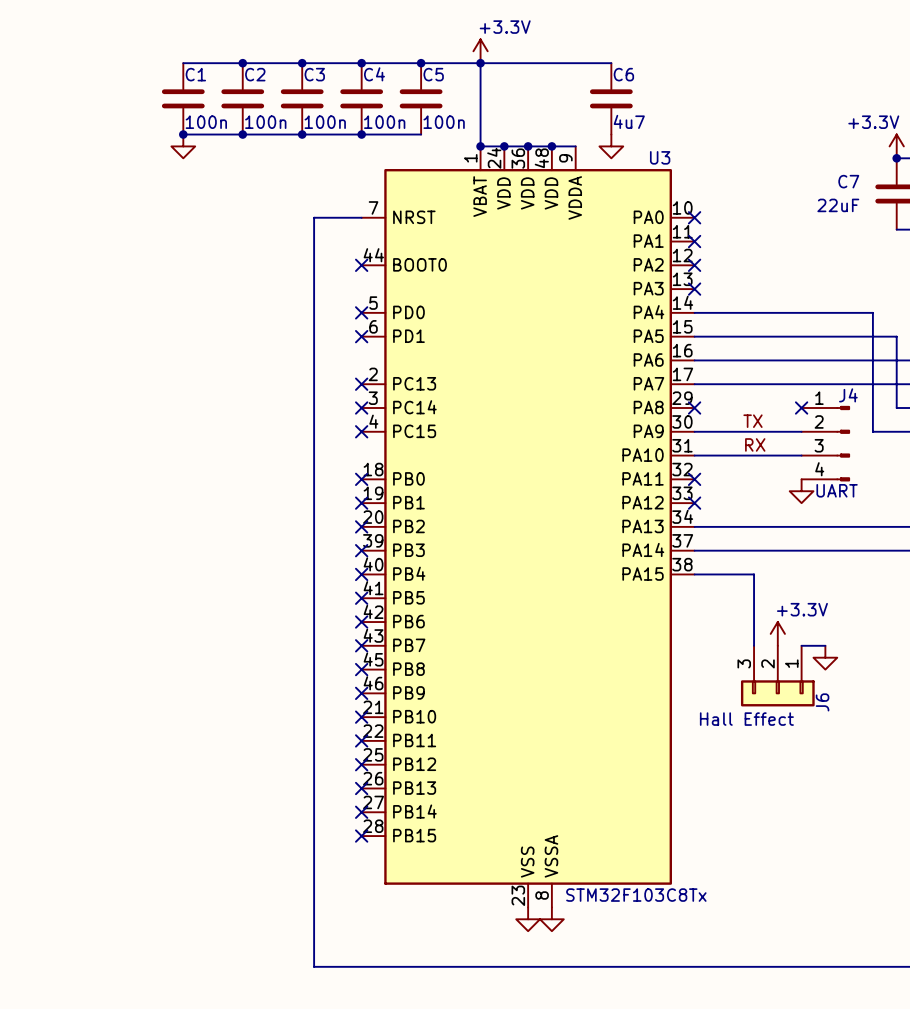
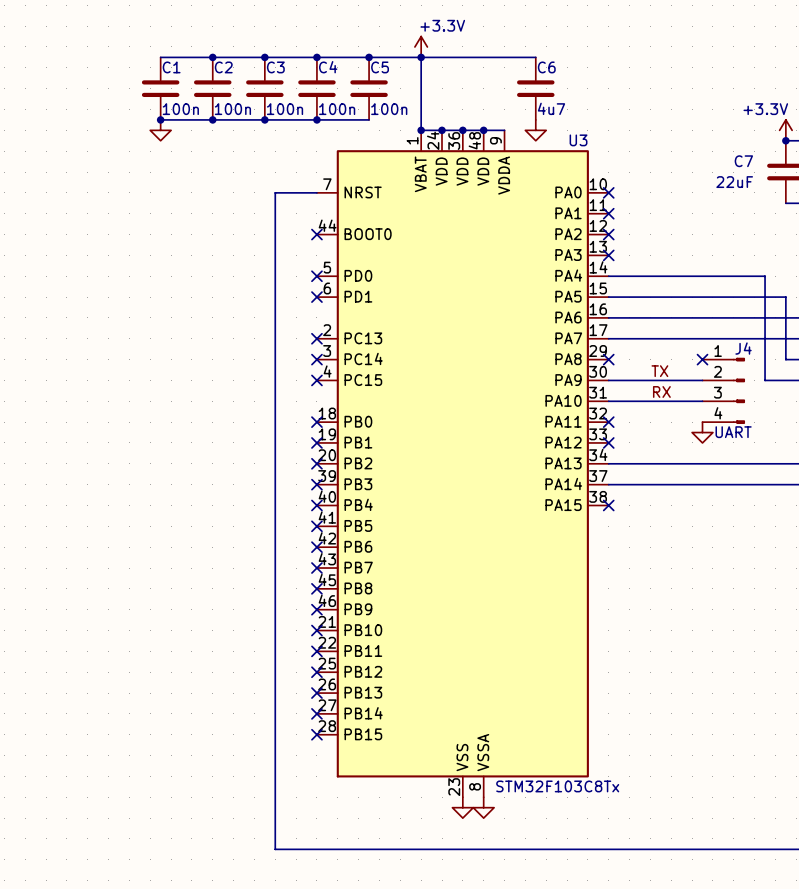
wire: (694, 574) (754, 574) (754, 645) -> none
no-connect mark: none -> (608, 505)
power symbol: +3.3V (777, 633) -> none
wire: (801, 645) (825, 645) -> none
power symbol: (825, 657) -> none
J6: Hall Effect (777, 676) -> none

